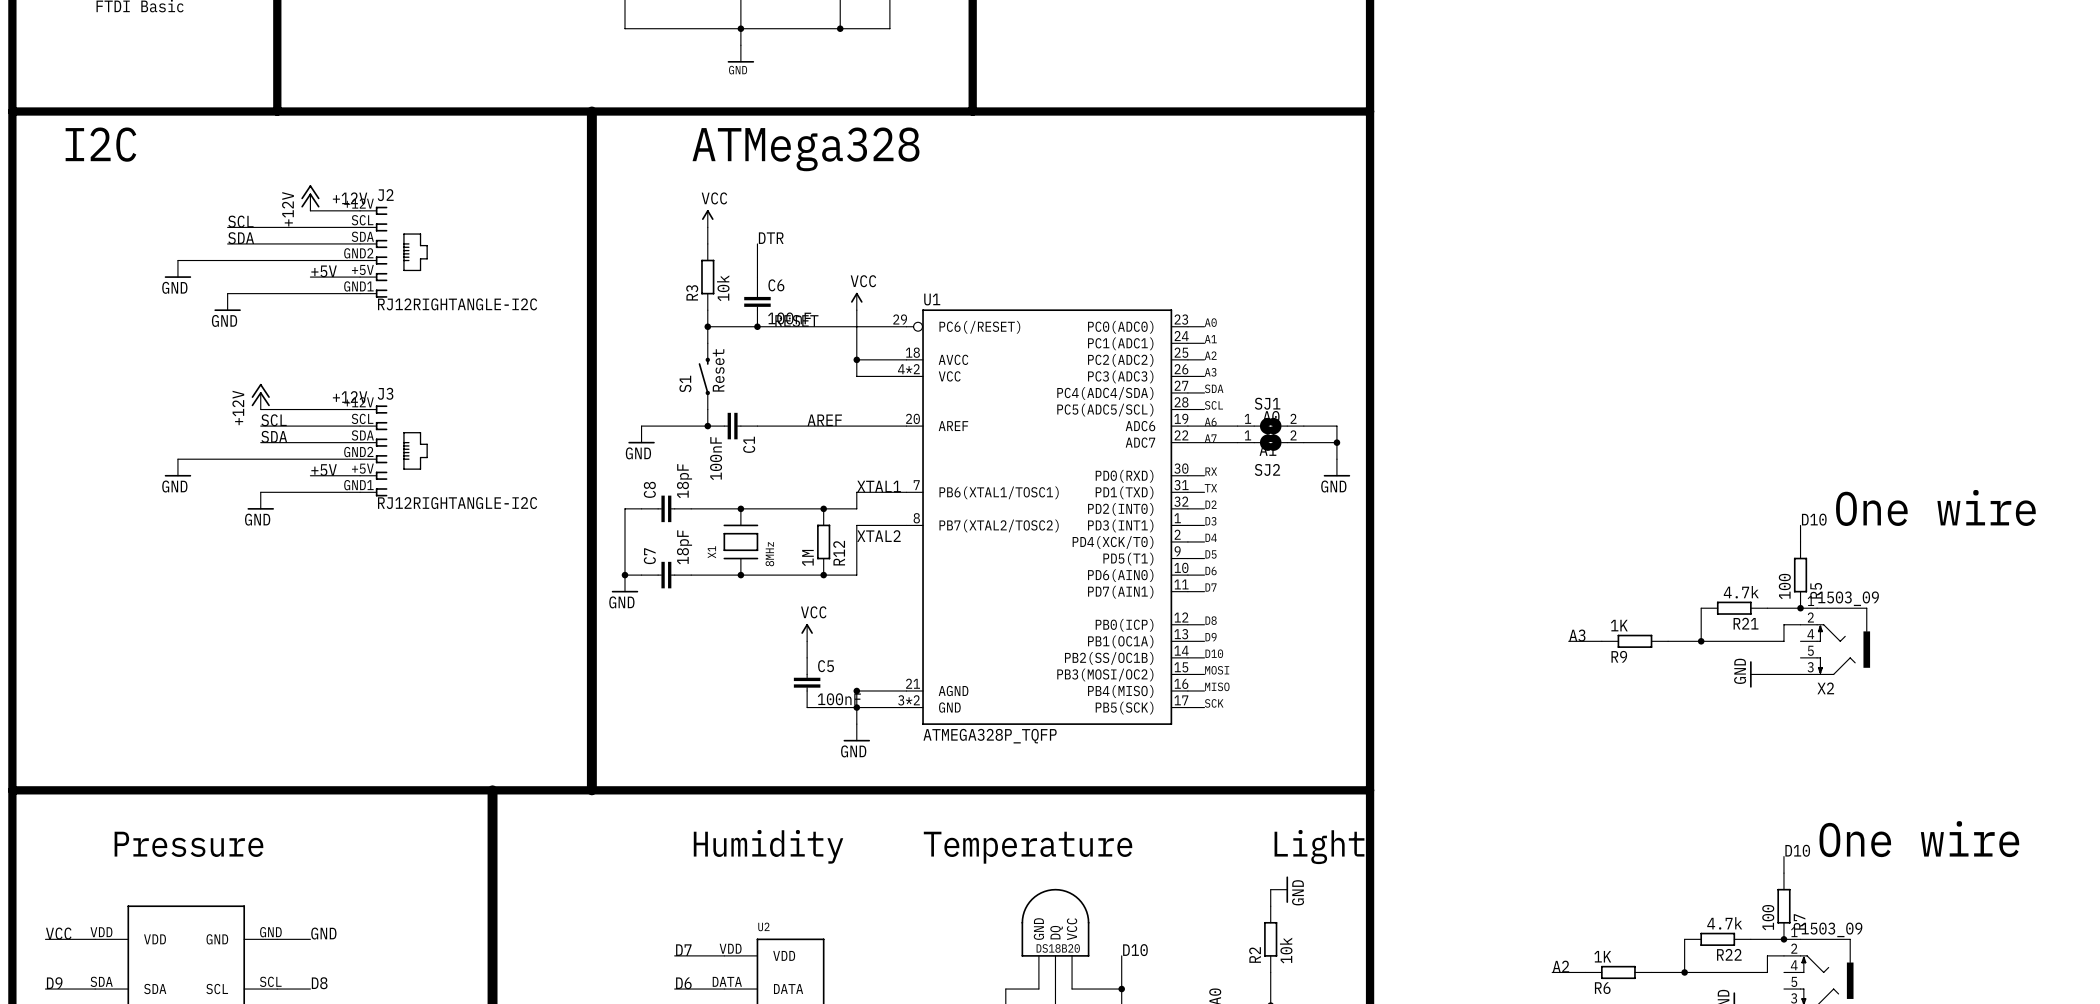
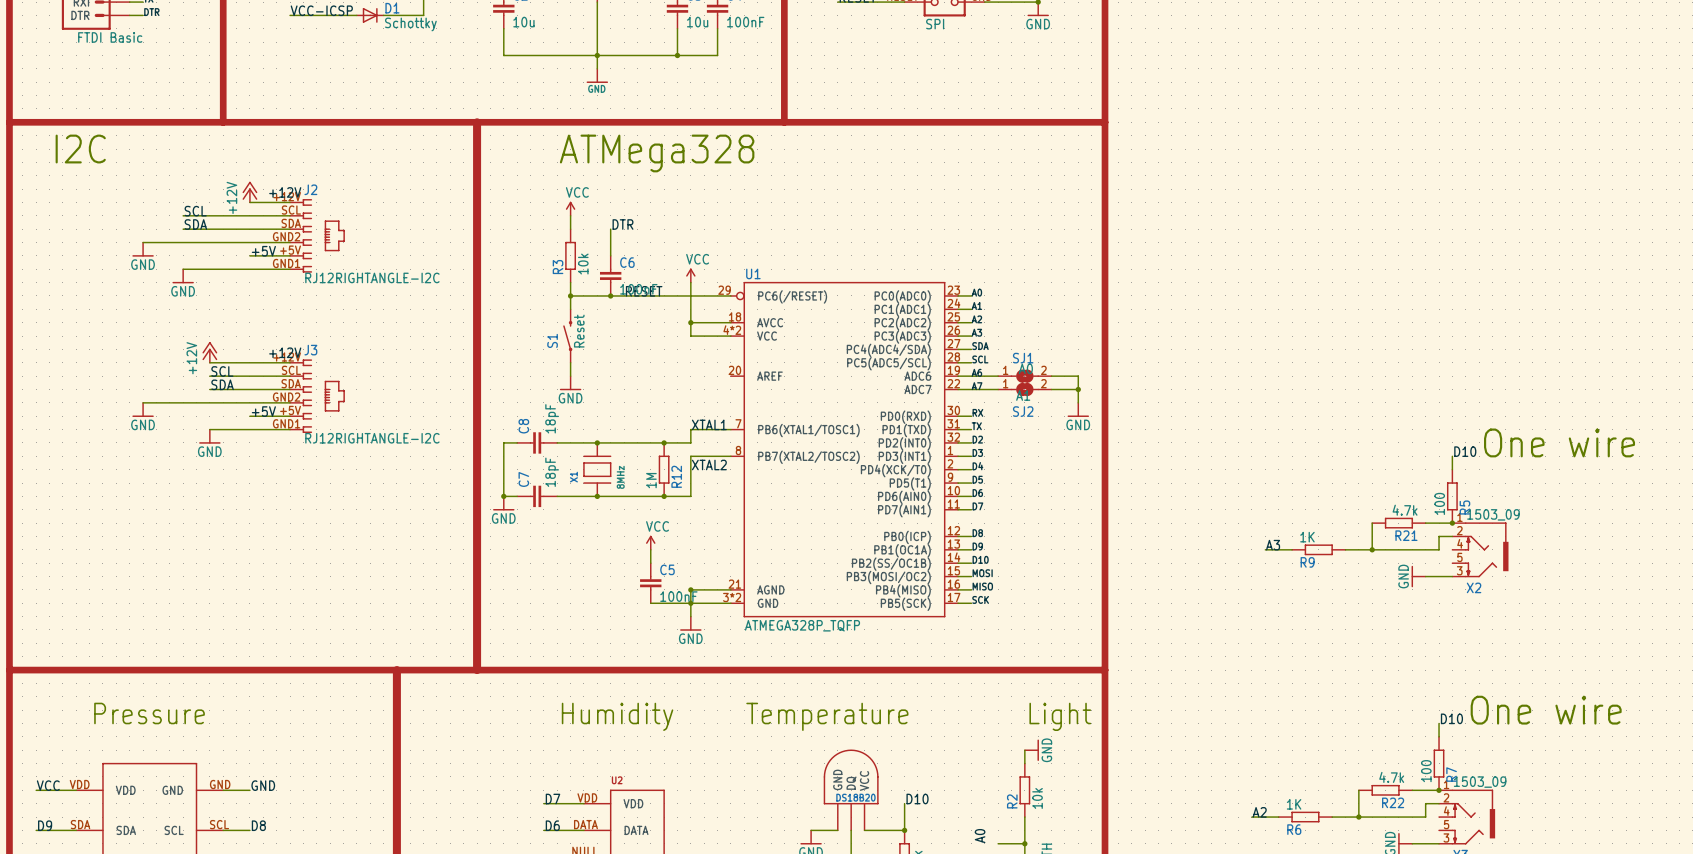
label: AREF (824, 420) -> none
wire: (641, 426) (707, 426) -> none
junction: (707, 426) -> none
C1: 100nF (732, 426) -> none
wire: (757, 426) (906, 426) -> none
power symbol position: GND (641, 434) -> GND (570, 383)

